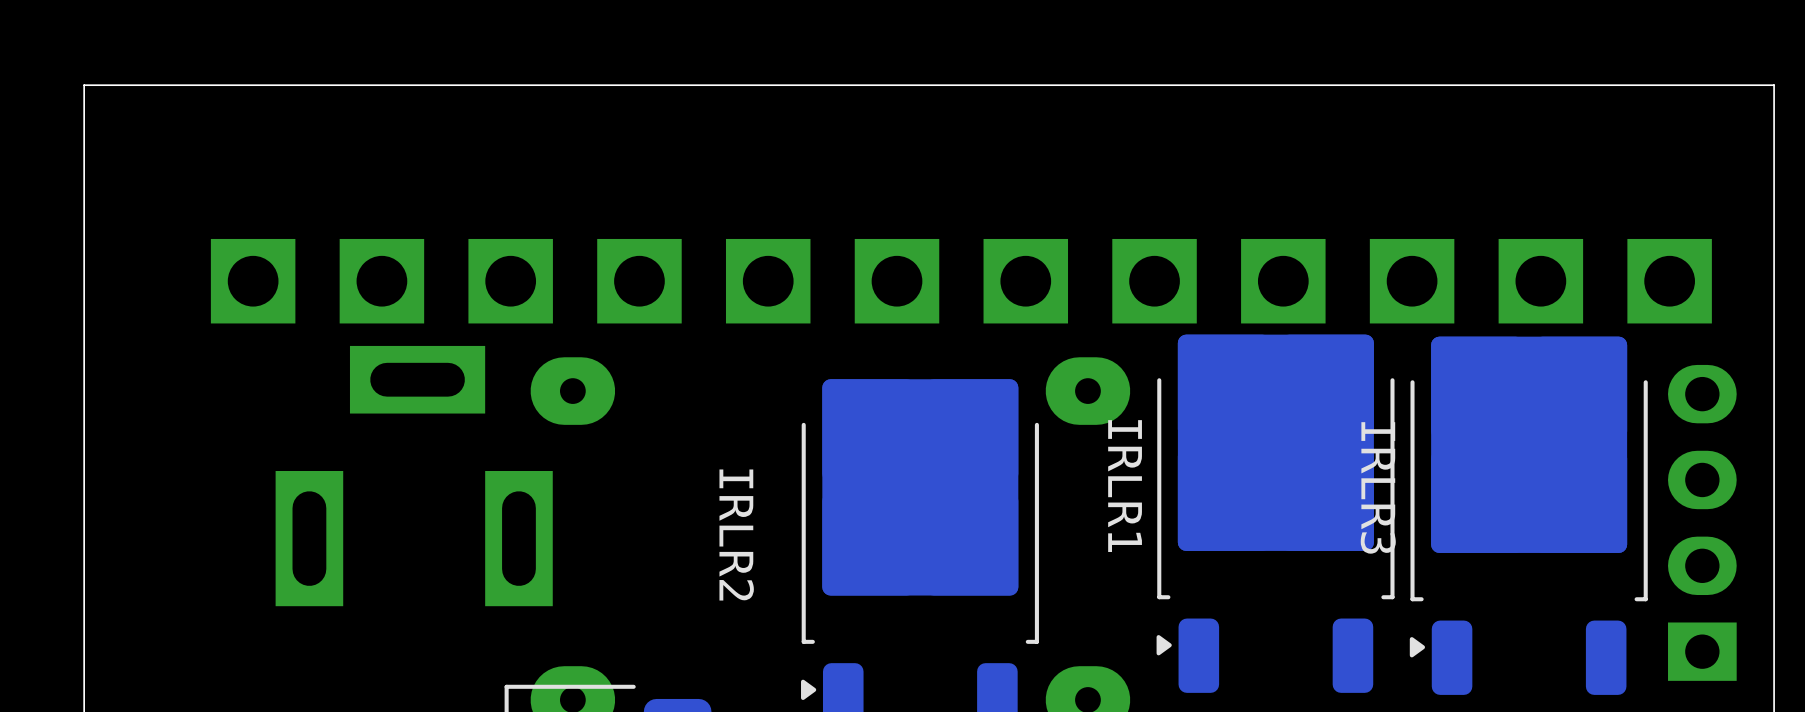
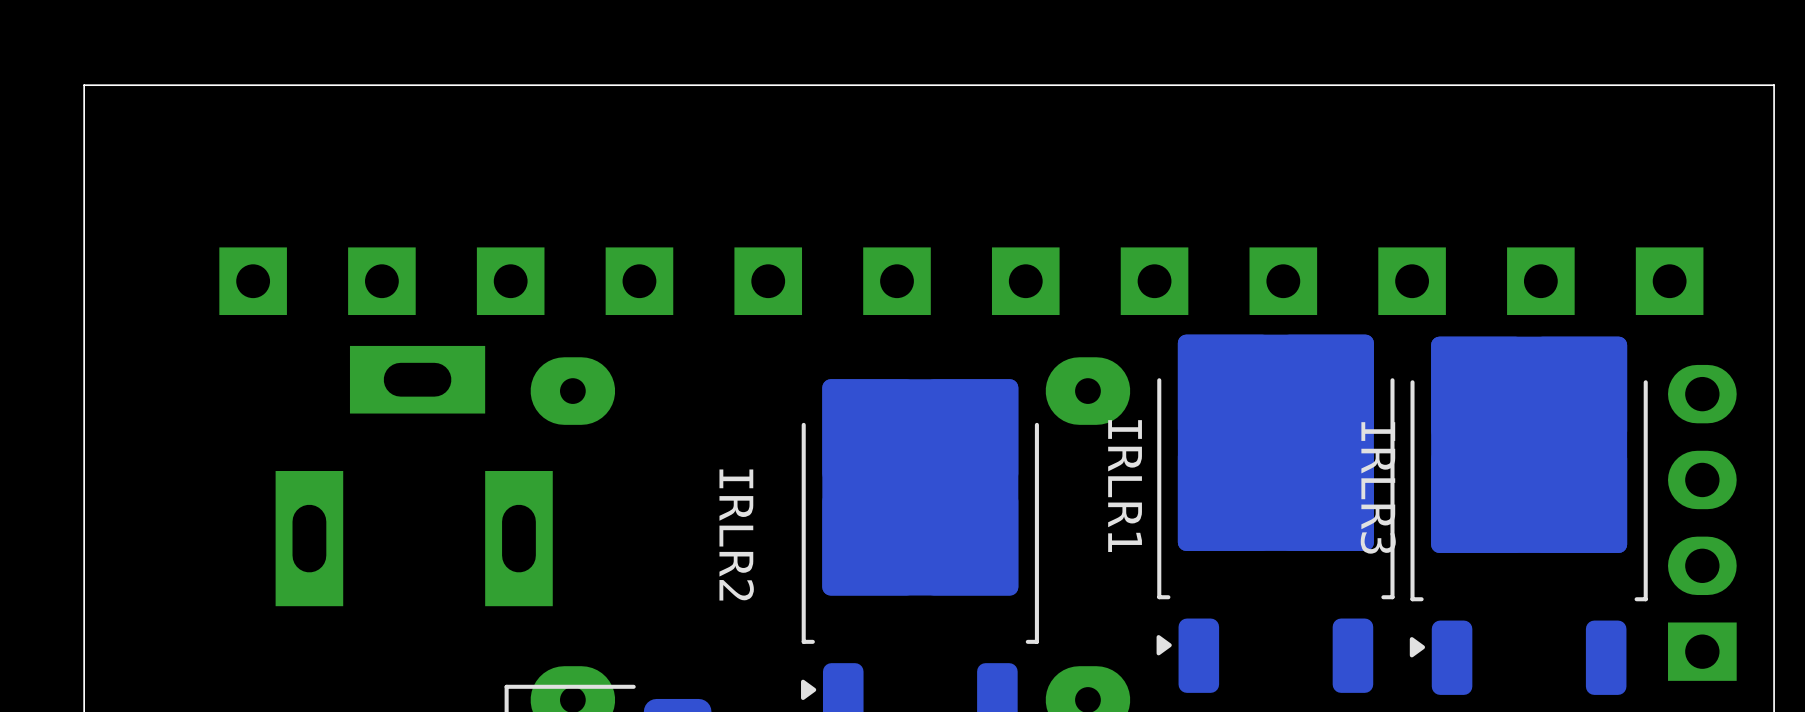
part footprint: [210, 238, 1712, 324] -> [219, 247, 1704, 316]
part footprint: [275, 345, 553, 607] -> [275, 345, 553, 607]

